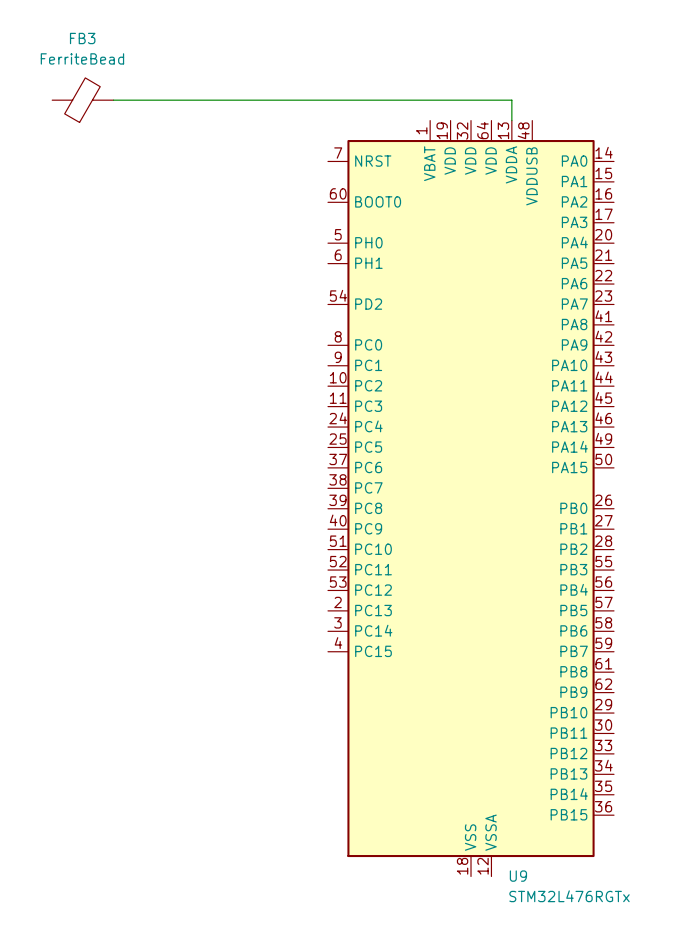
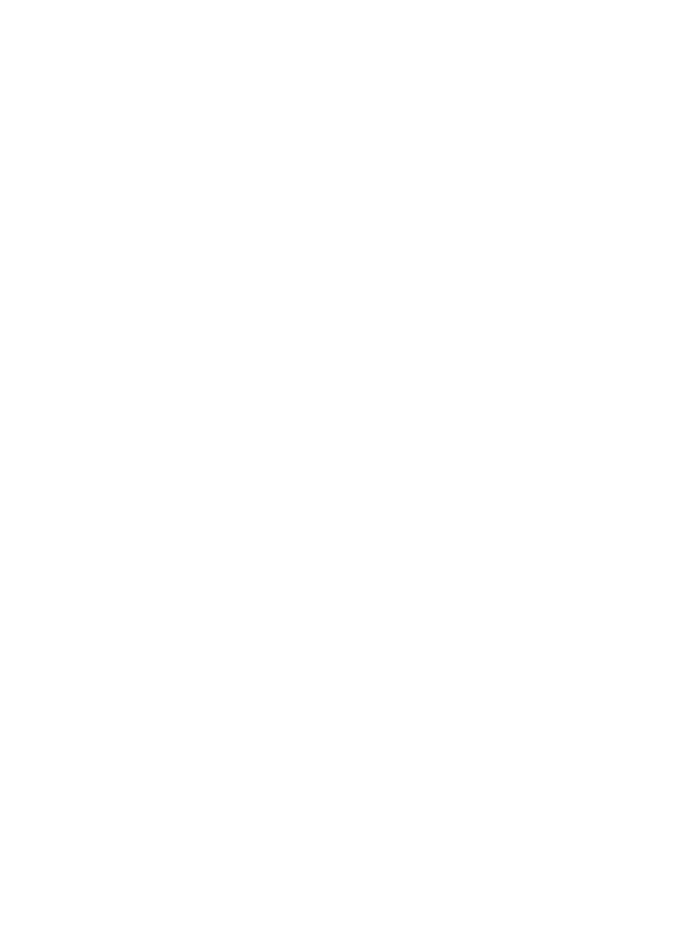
FB3: FerriteBead (82, 100) -> none
wire: (113, 100) (511, 100) (511, 120) -> none
U9: STM32L476RGTx (471, 498) -> none

